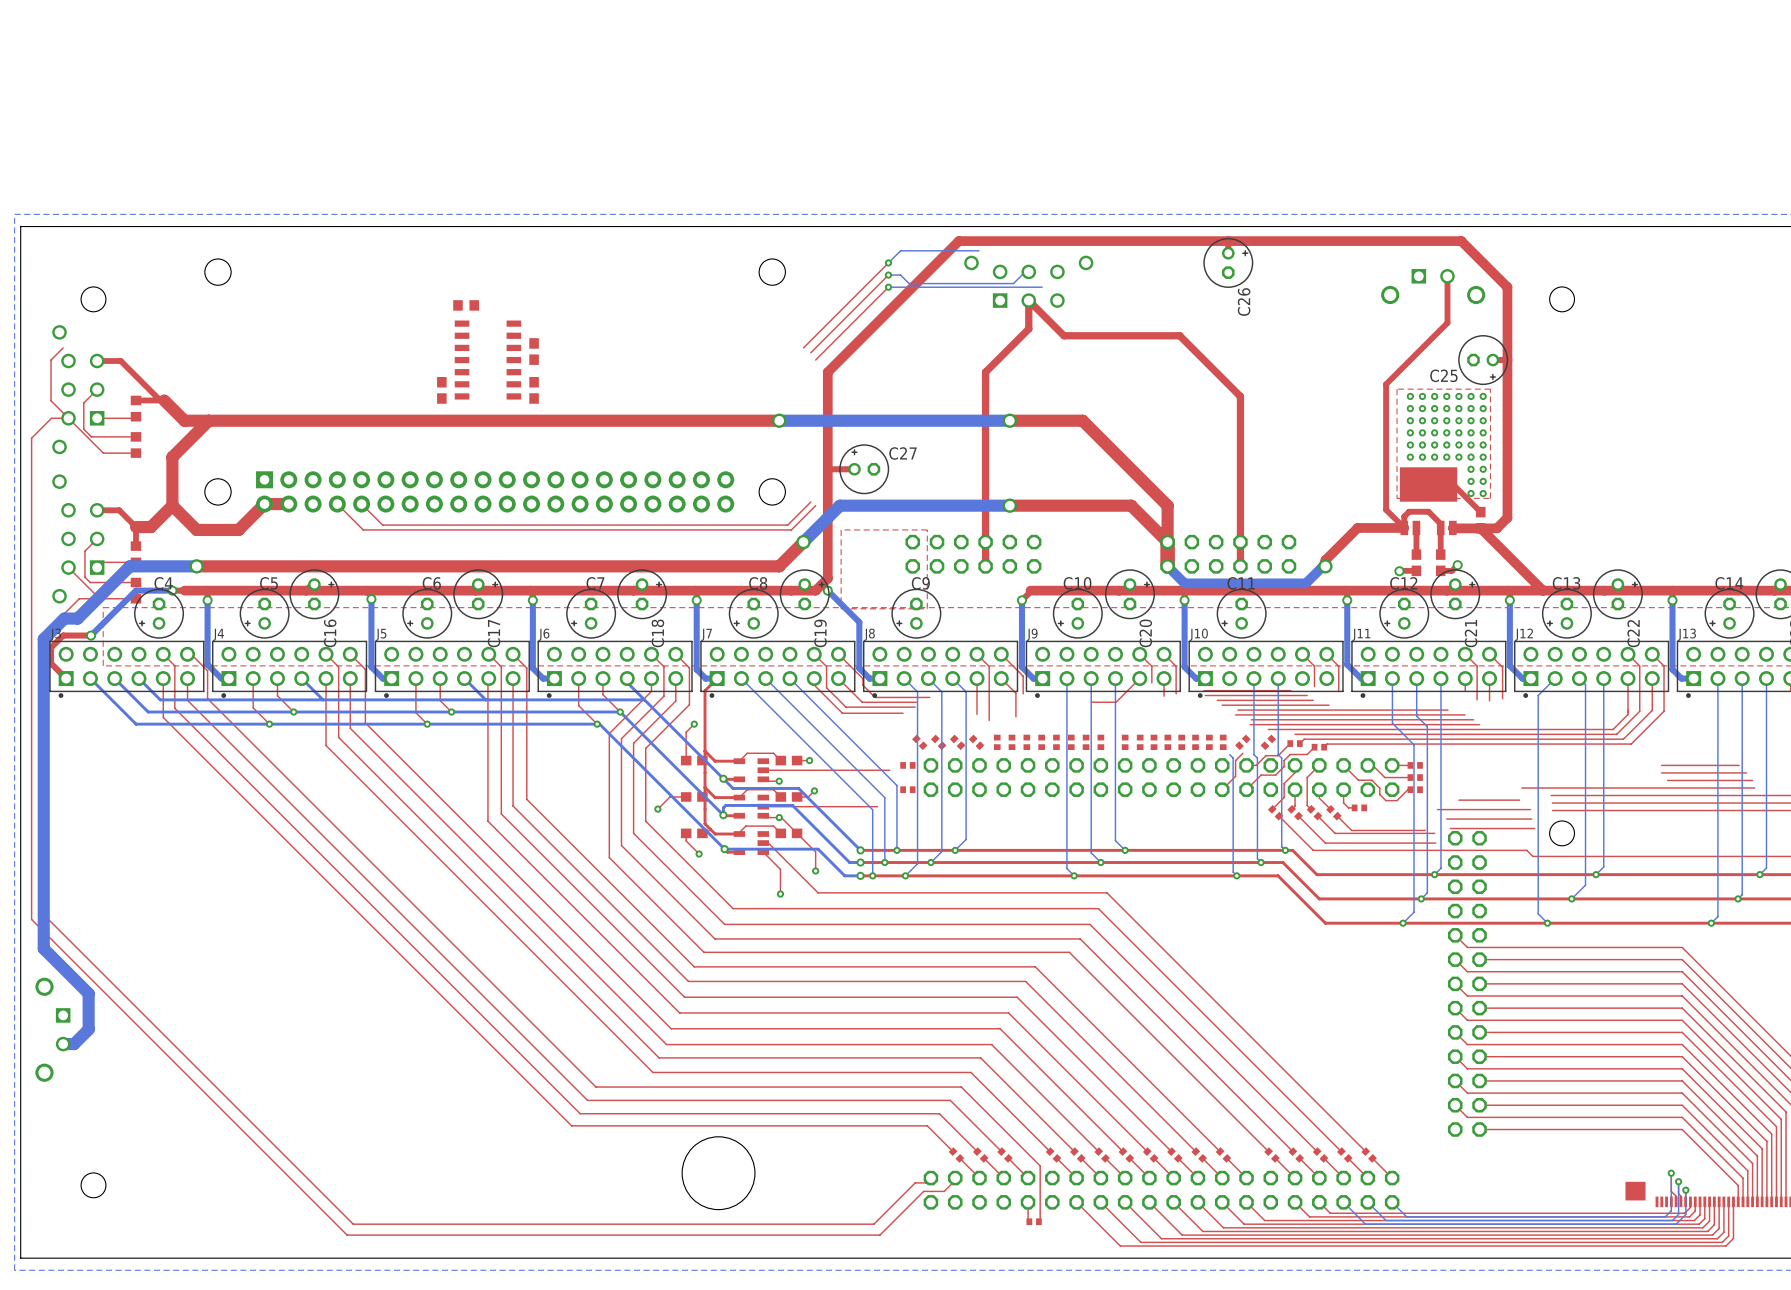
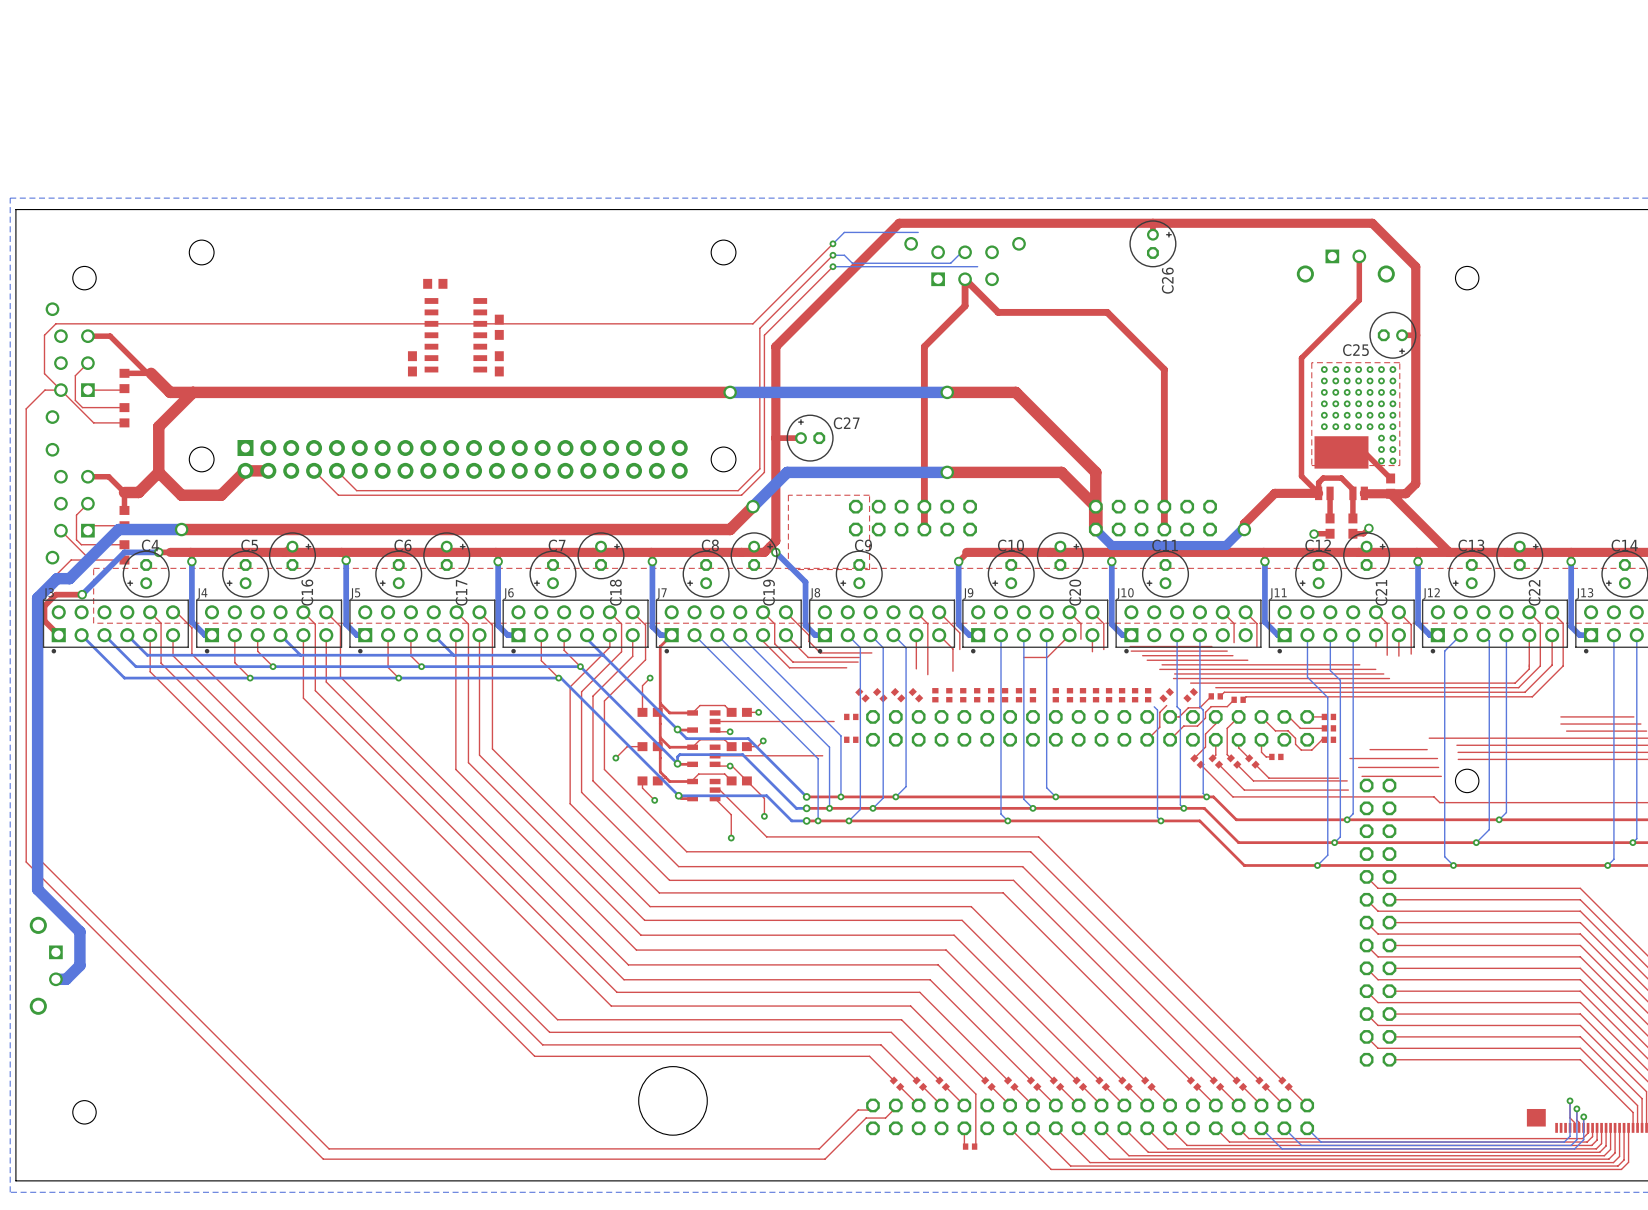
top track: none -> (752, 323) (55, 323)
top track: none -> (759, 328) (759, 468)
top track: none -> (764, 335) (764, 472)

